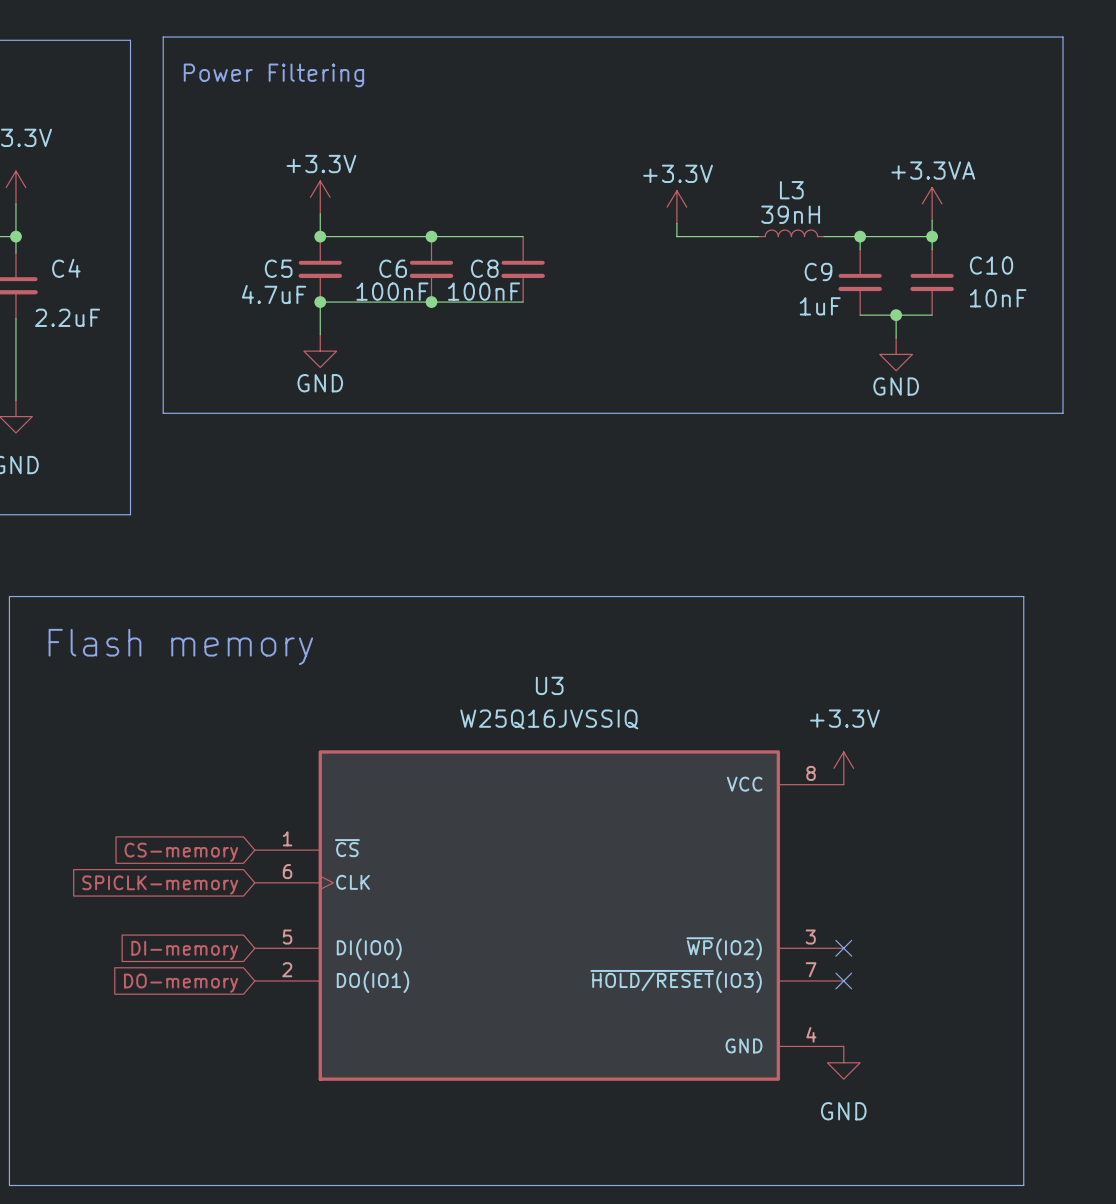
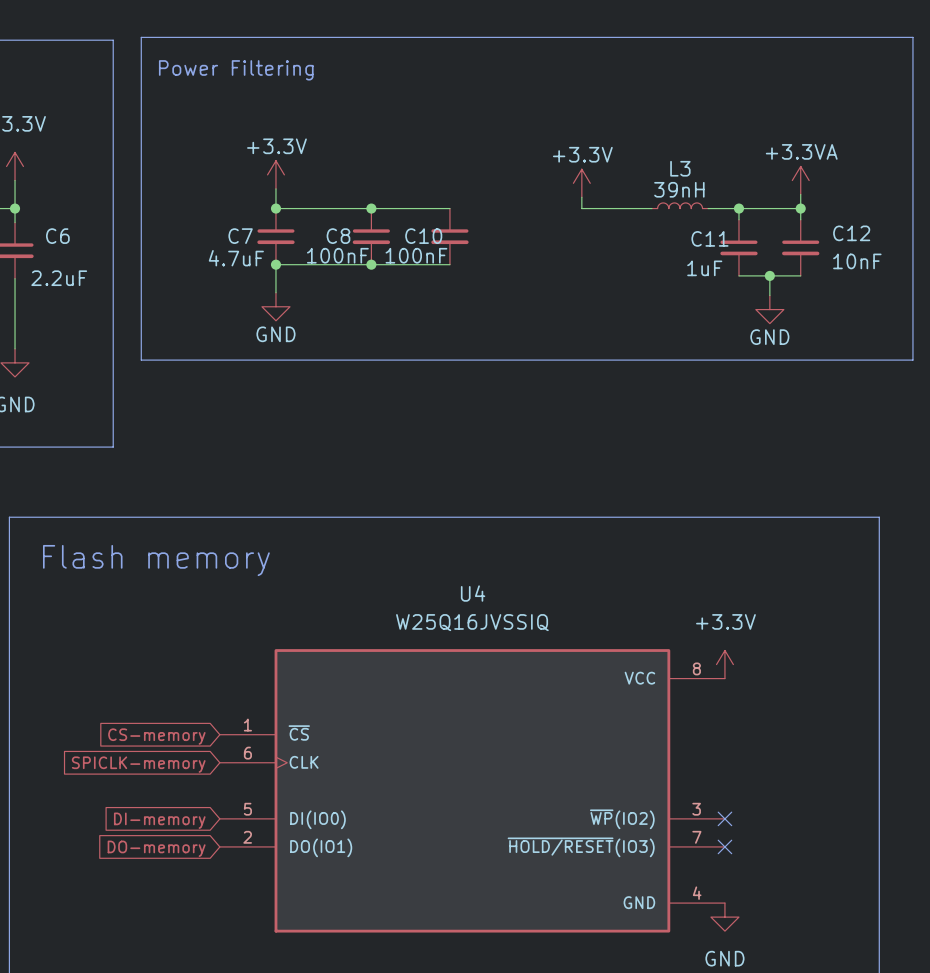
C10 name: C10 (991, 265) -> C12 (851, 233)
C4 name: C4 (66, 268) -> C6 (57, 236)
C5 name: C5 (278, 268) -> C7 (240, 236)
C6 name: C6 (393, 268) -> C8 (338, 236)
C8 name: C8 (484, 268) -> C10 (423, 236)
C9 name: C9 (818, 271) -> C11 (709, 238)
U3 name: U3 (549, 685) -> U4 (473, 593)

